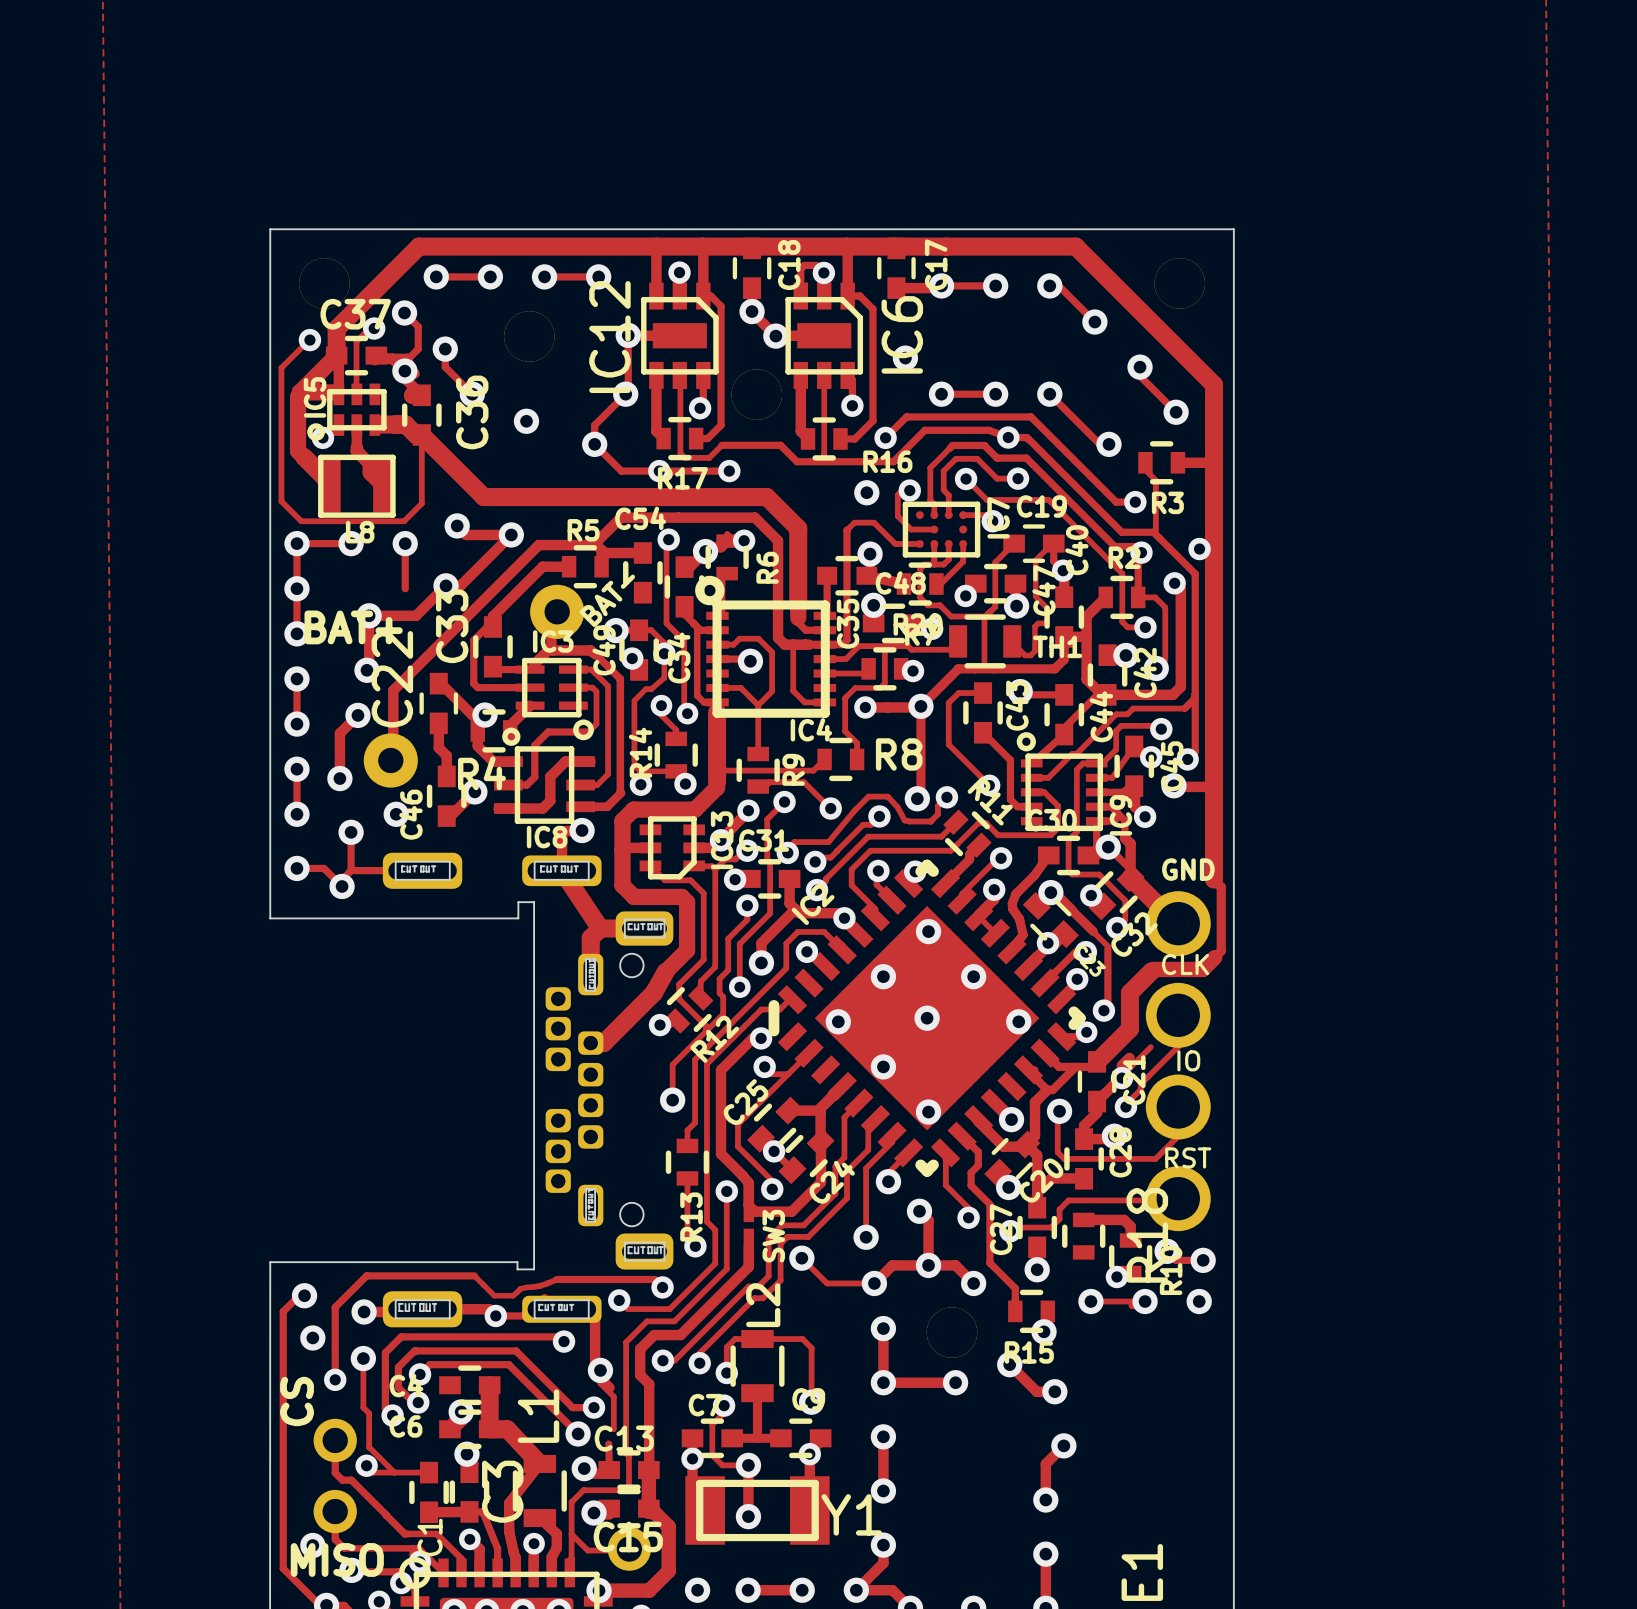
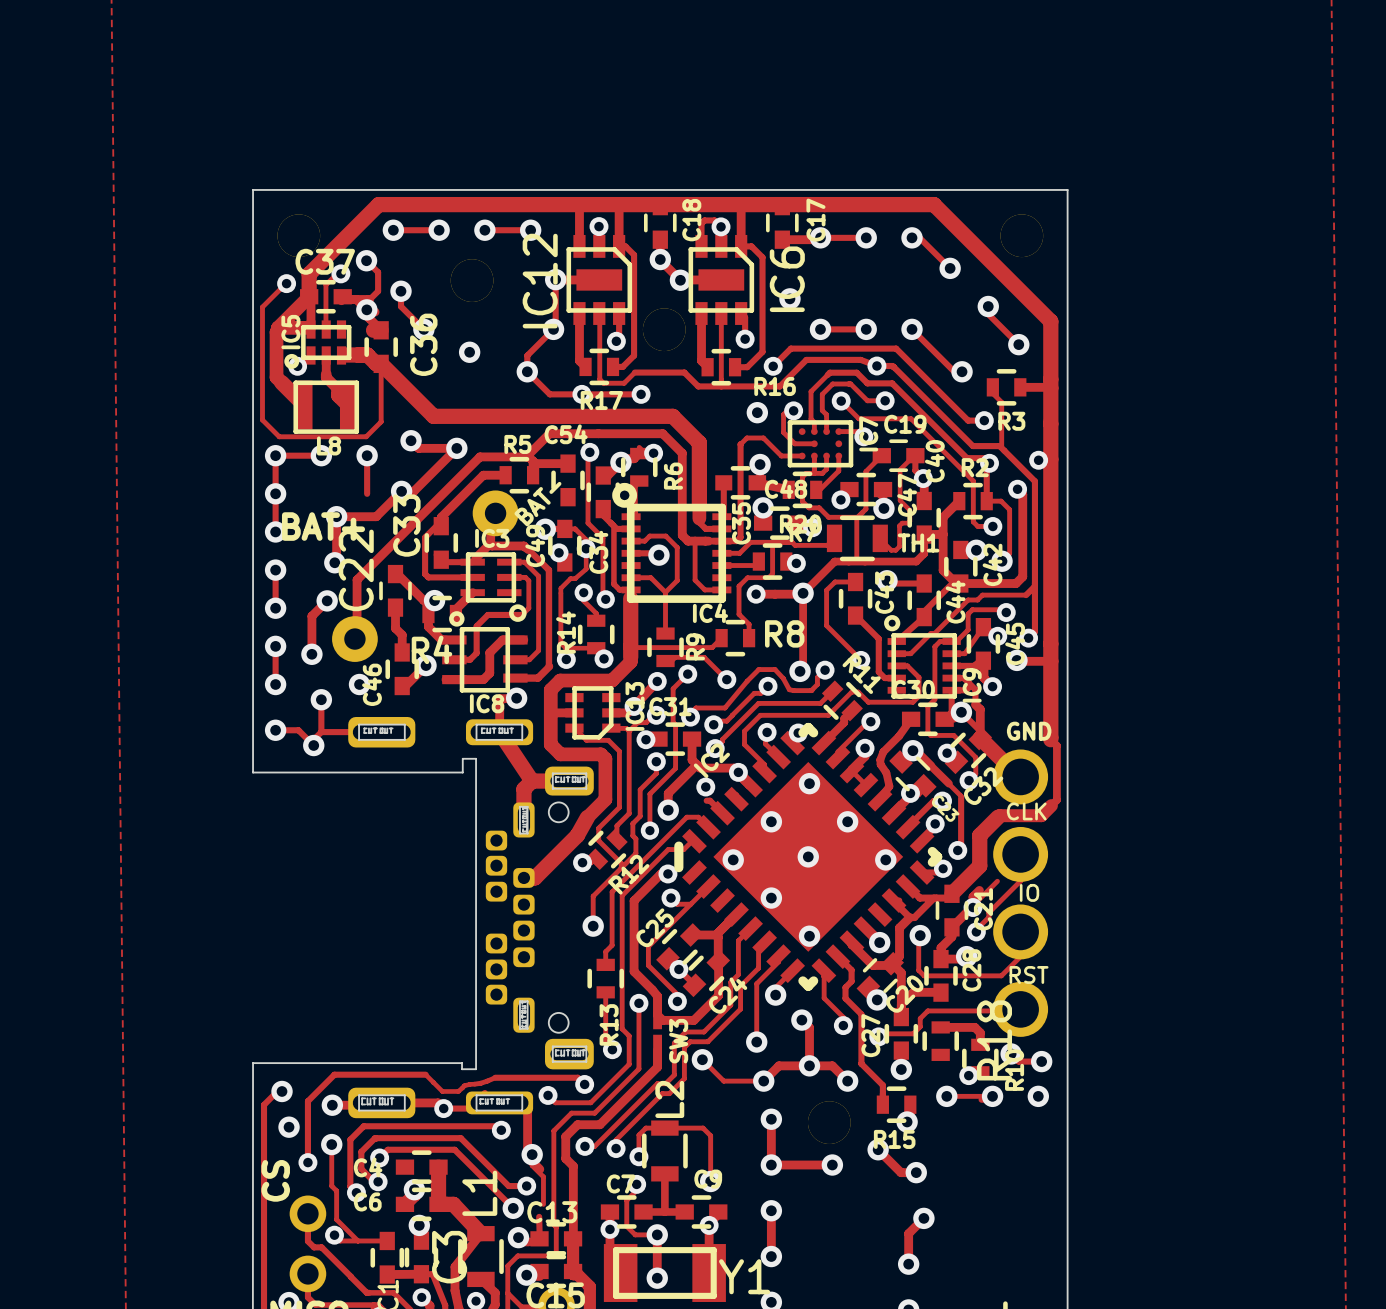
track: (842, 949) (824, 931) (797, 931) (786, 943) (786, 968) (783, 971) -> (708, 827) (698, 817) (686, 817)
via position: (806, 951) -> (705, 787)

